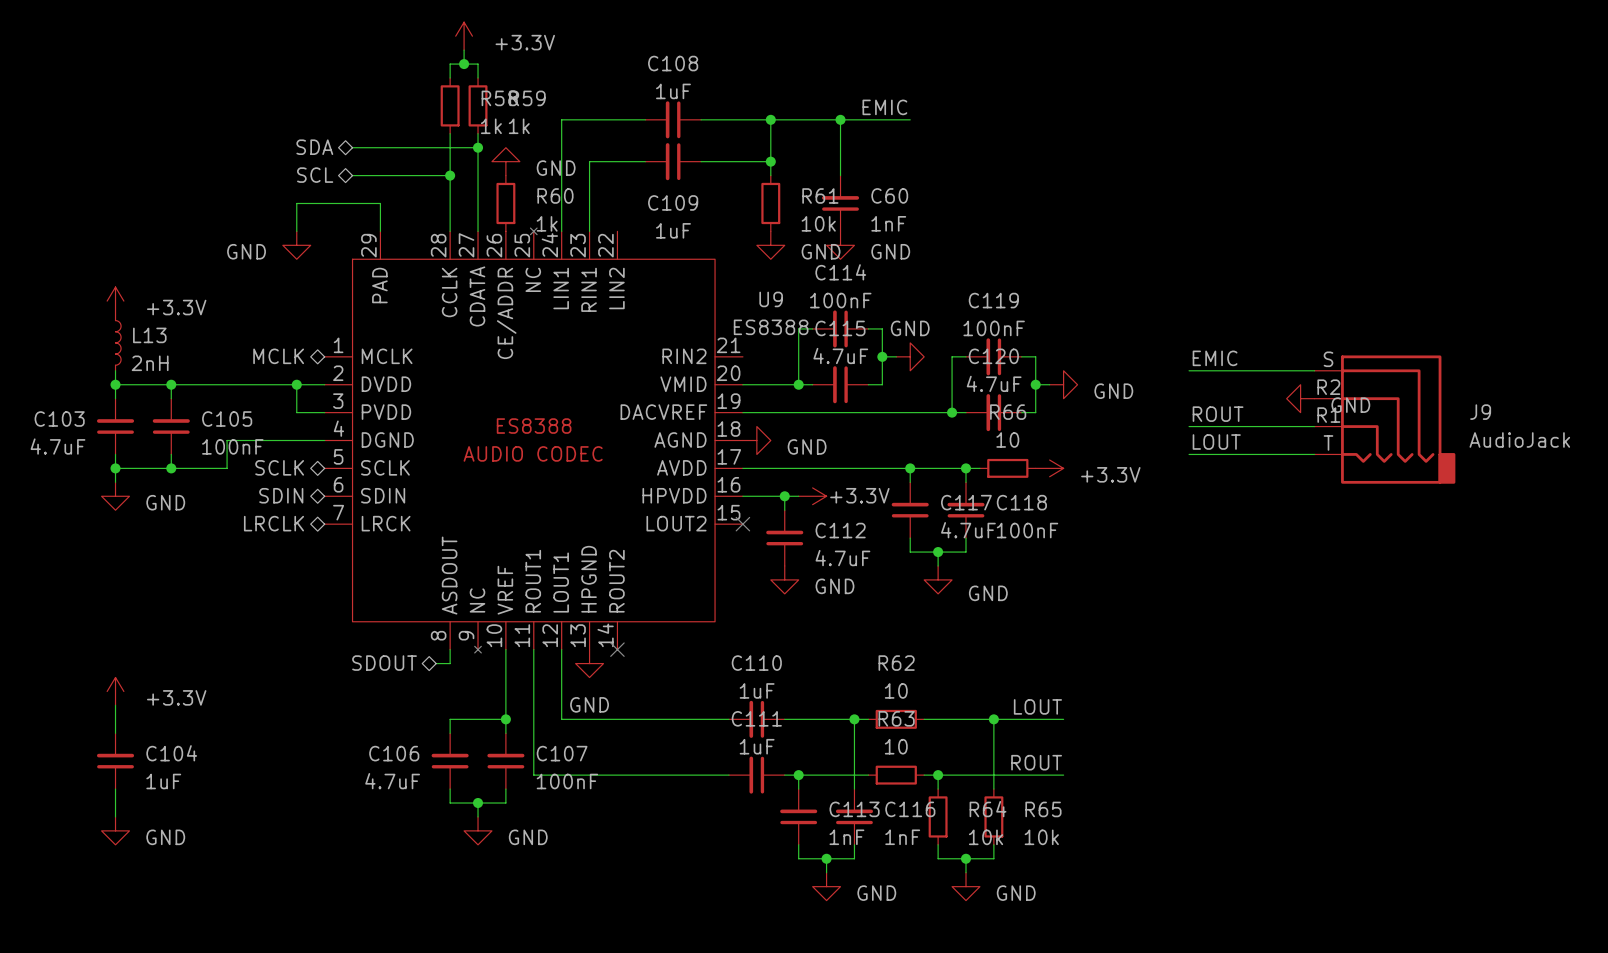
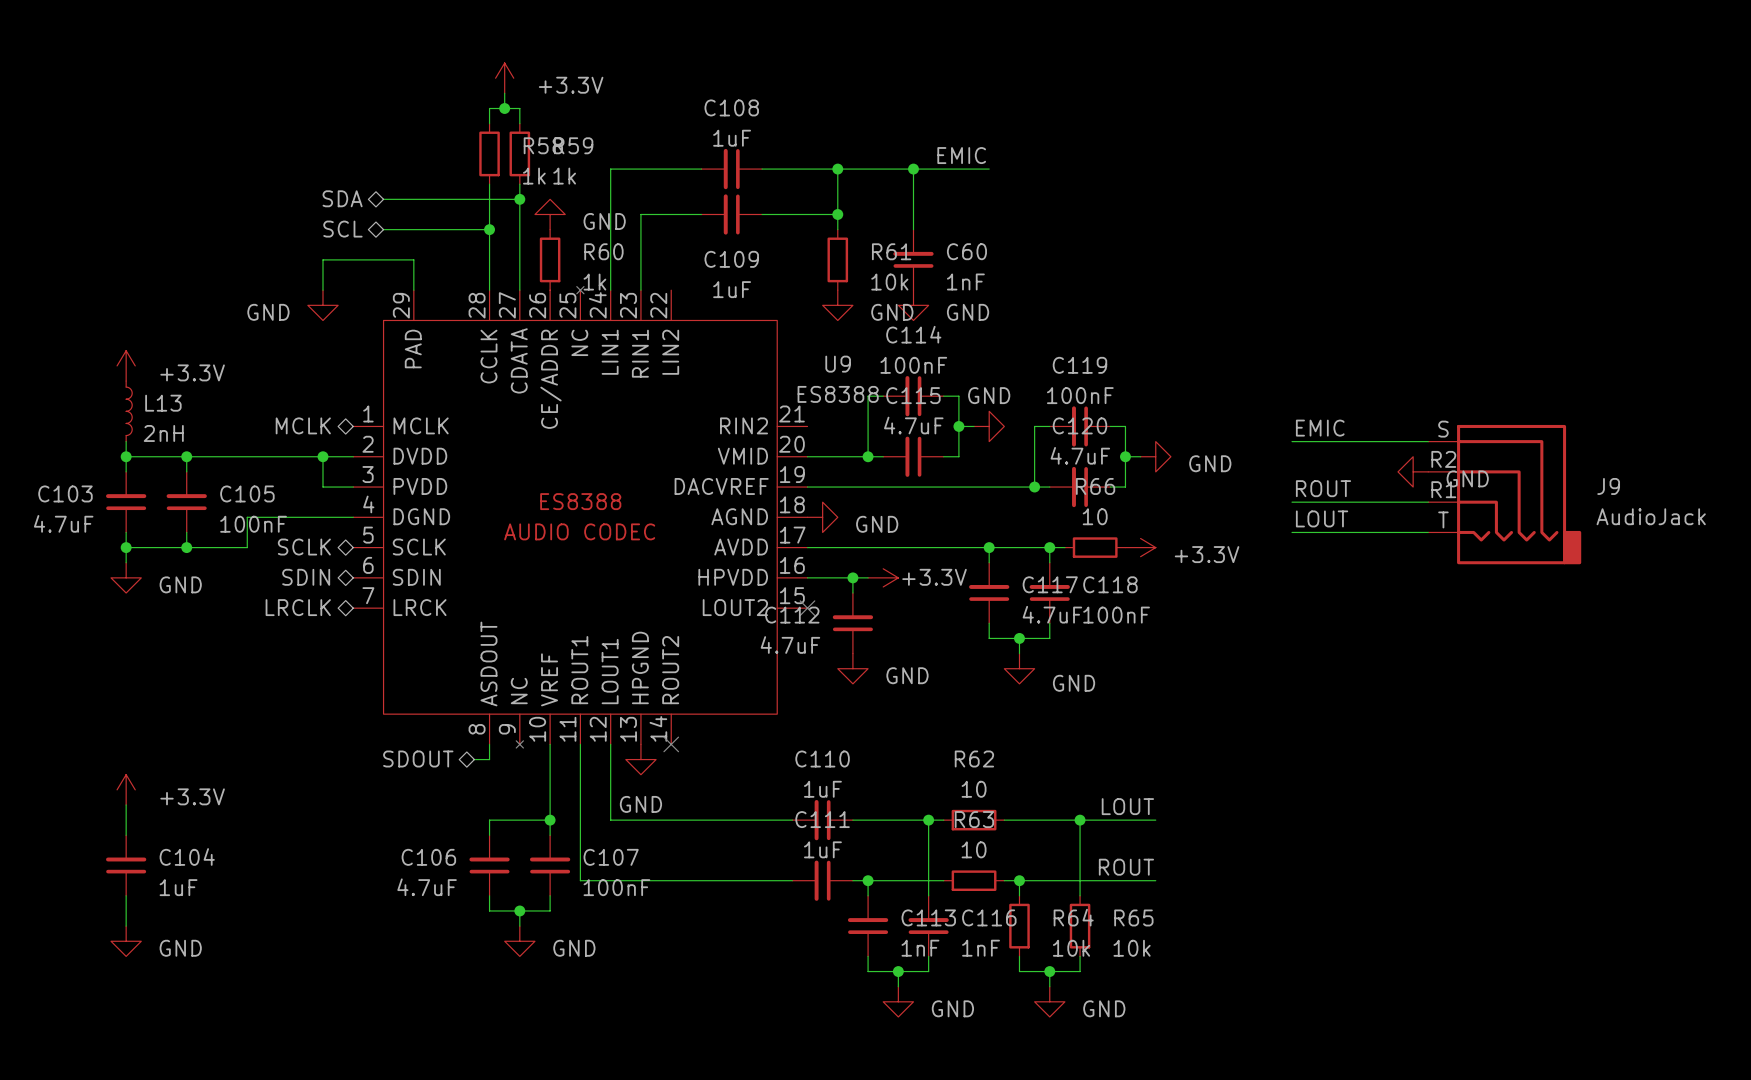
C112 name position: C112 (840, 530) -> C112 (792, 615)
C112 value position: 4.7uF (842, 558) -> 4.7uF (790, 645)

